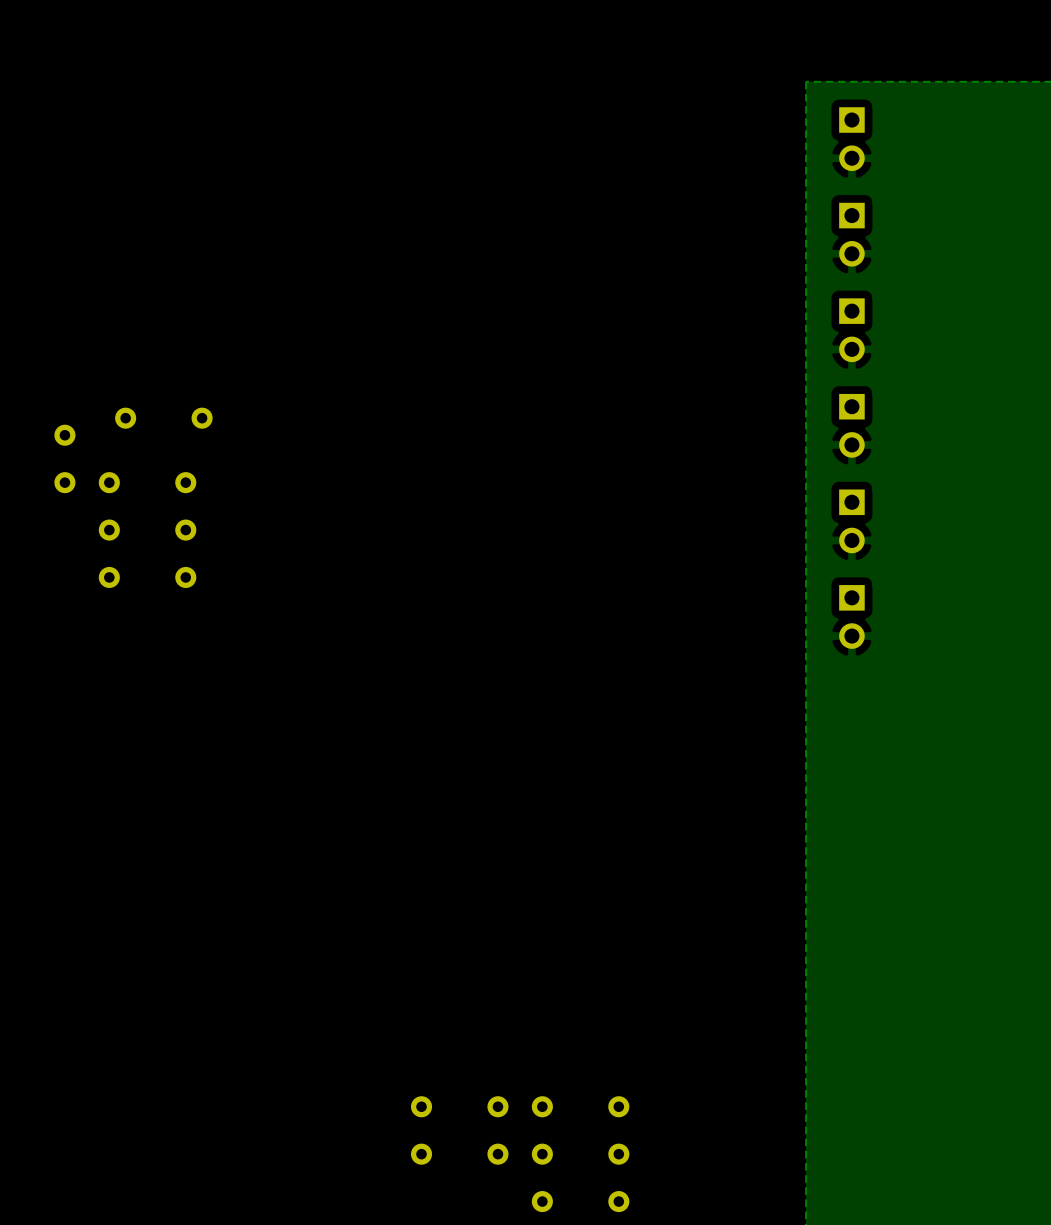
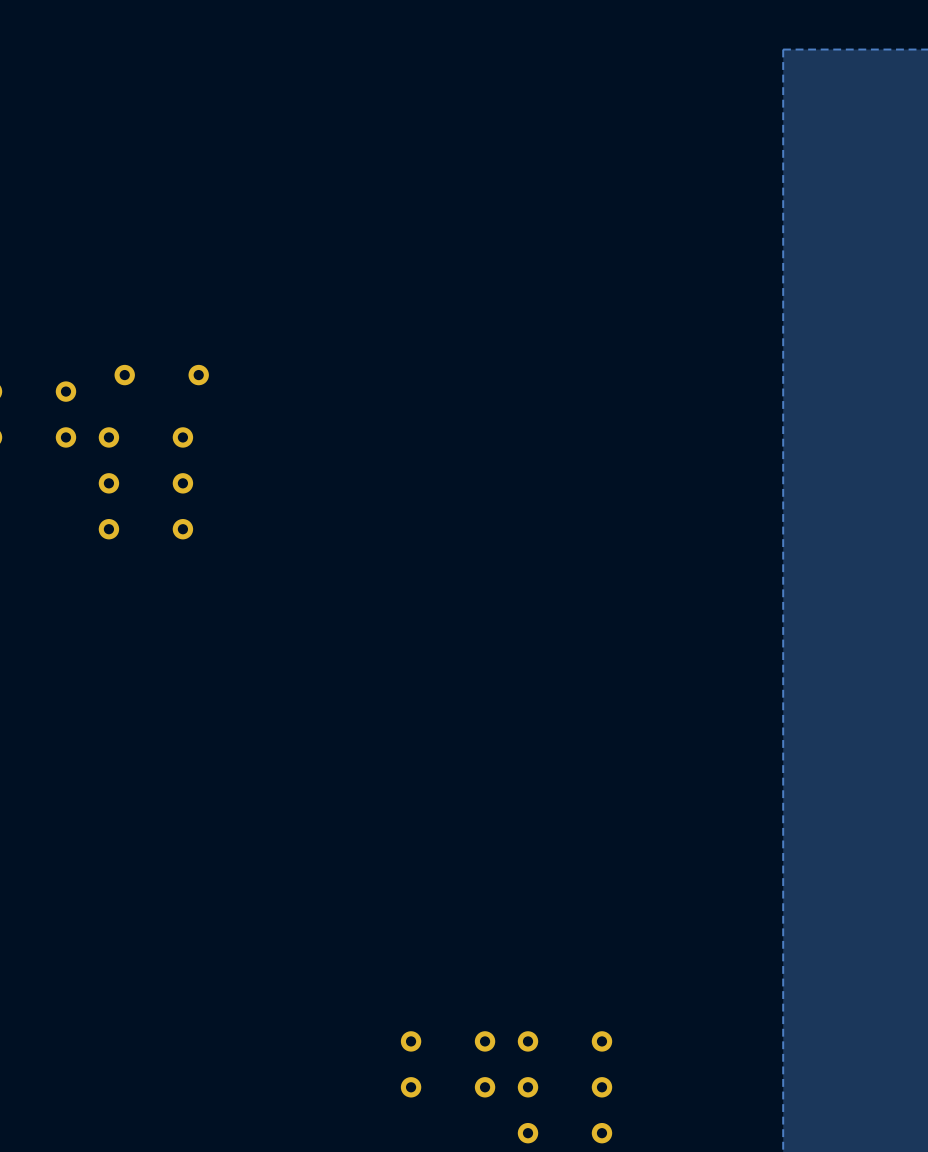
part: (851, 139) -> none
part: (851, 234) -> none
part: (851, 330) -> none
part: (851, 425) -> none
part: (851, 521) -> none
part: (851, 616) -> none

